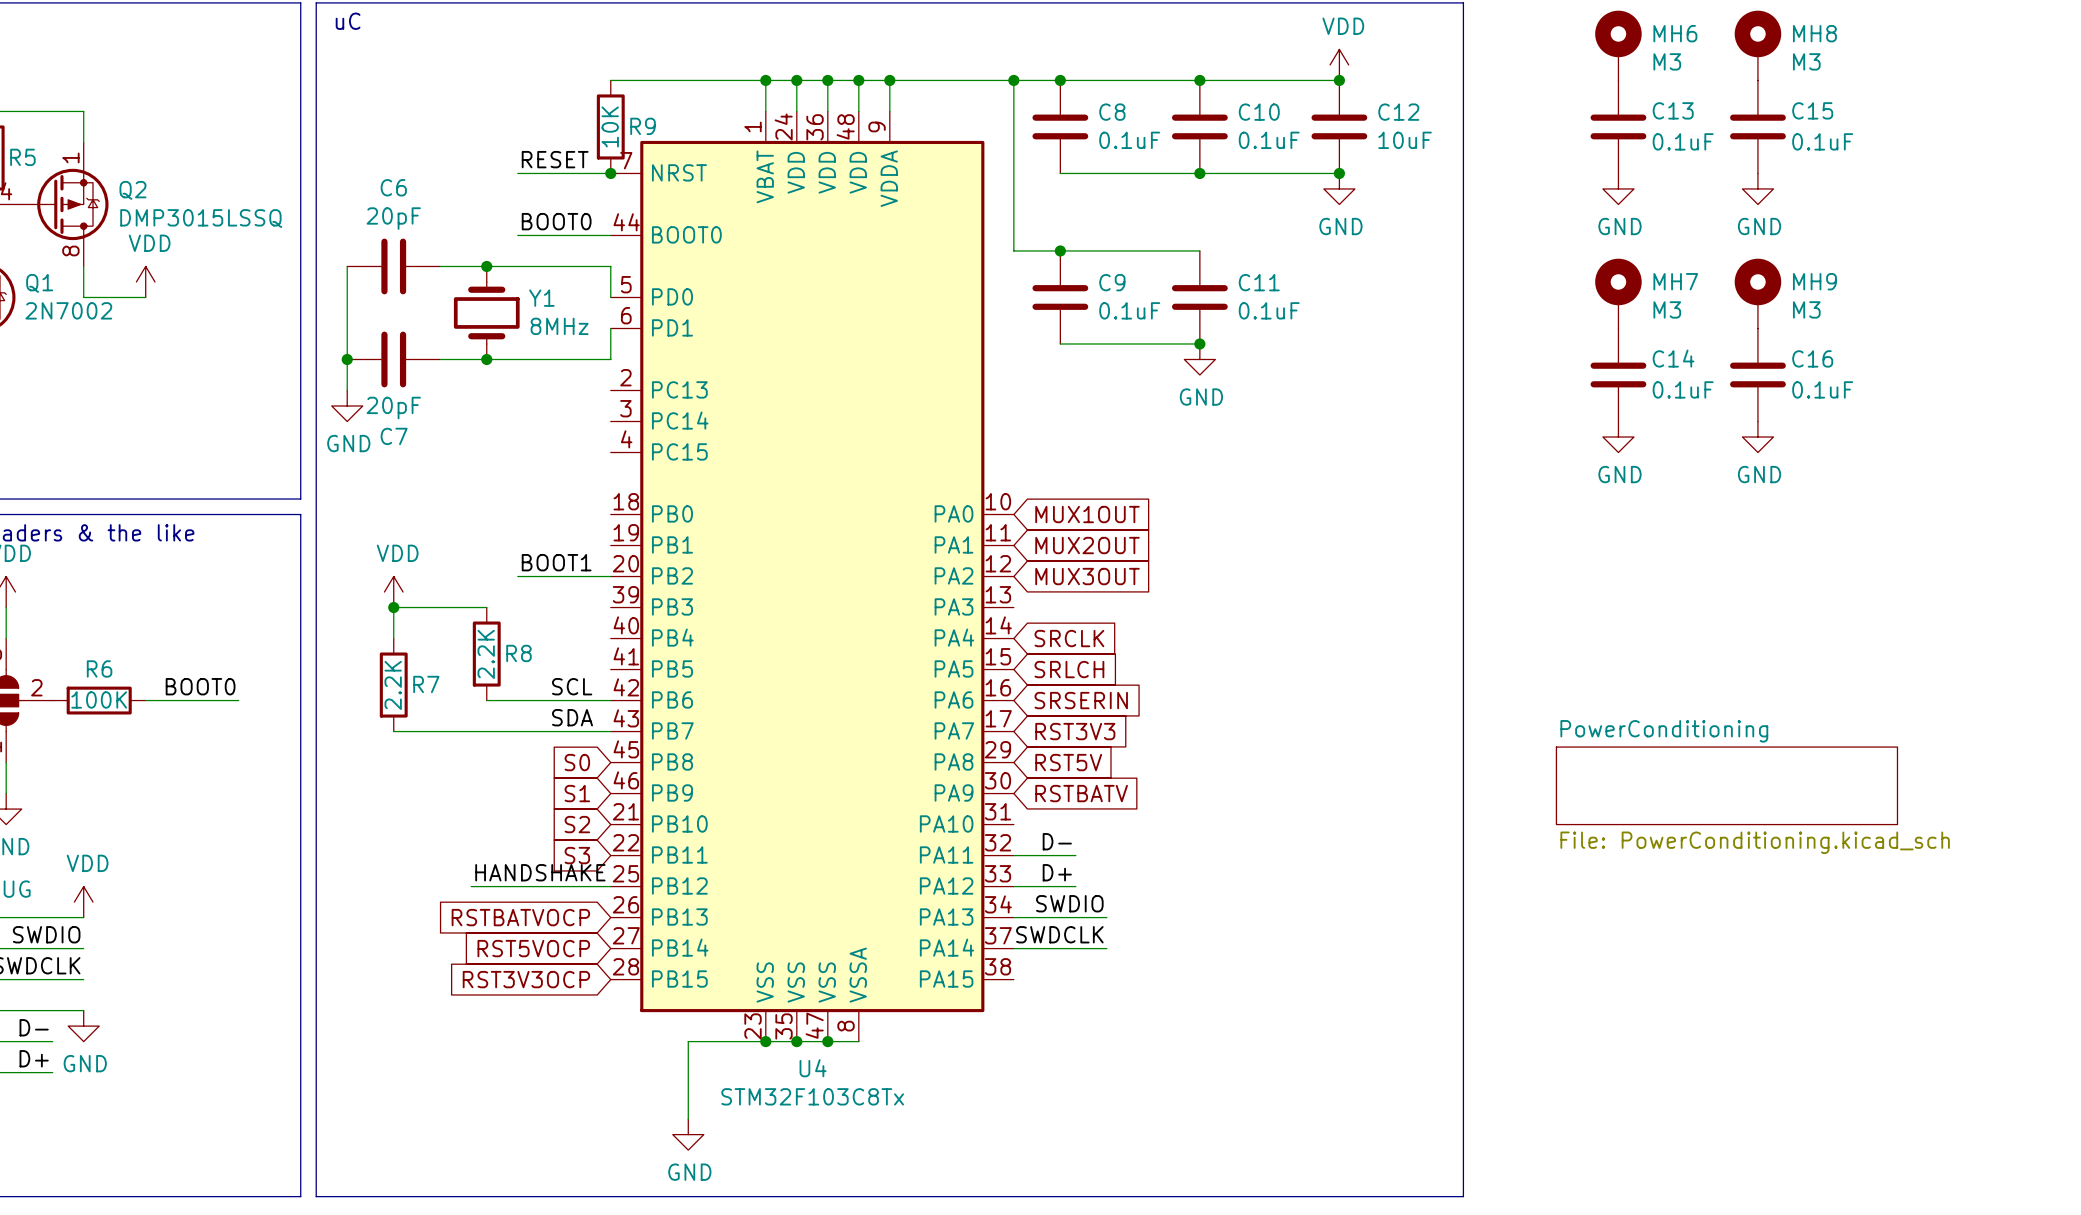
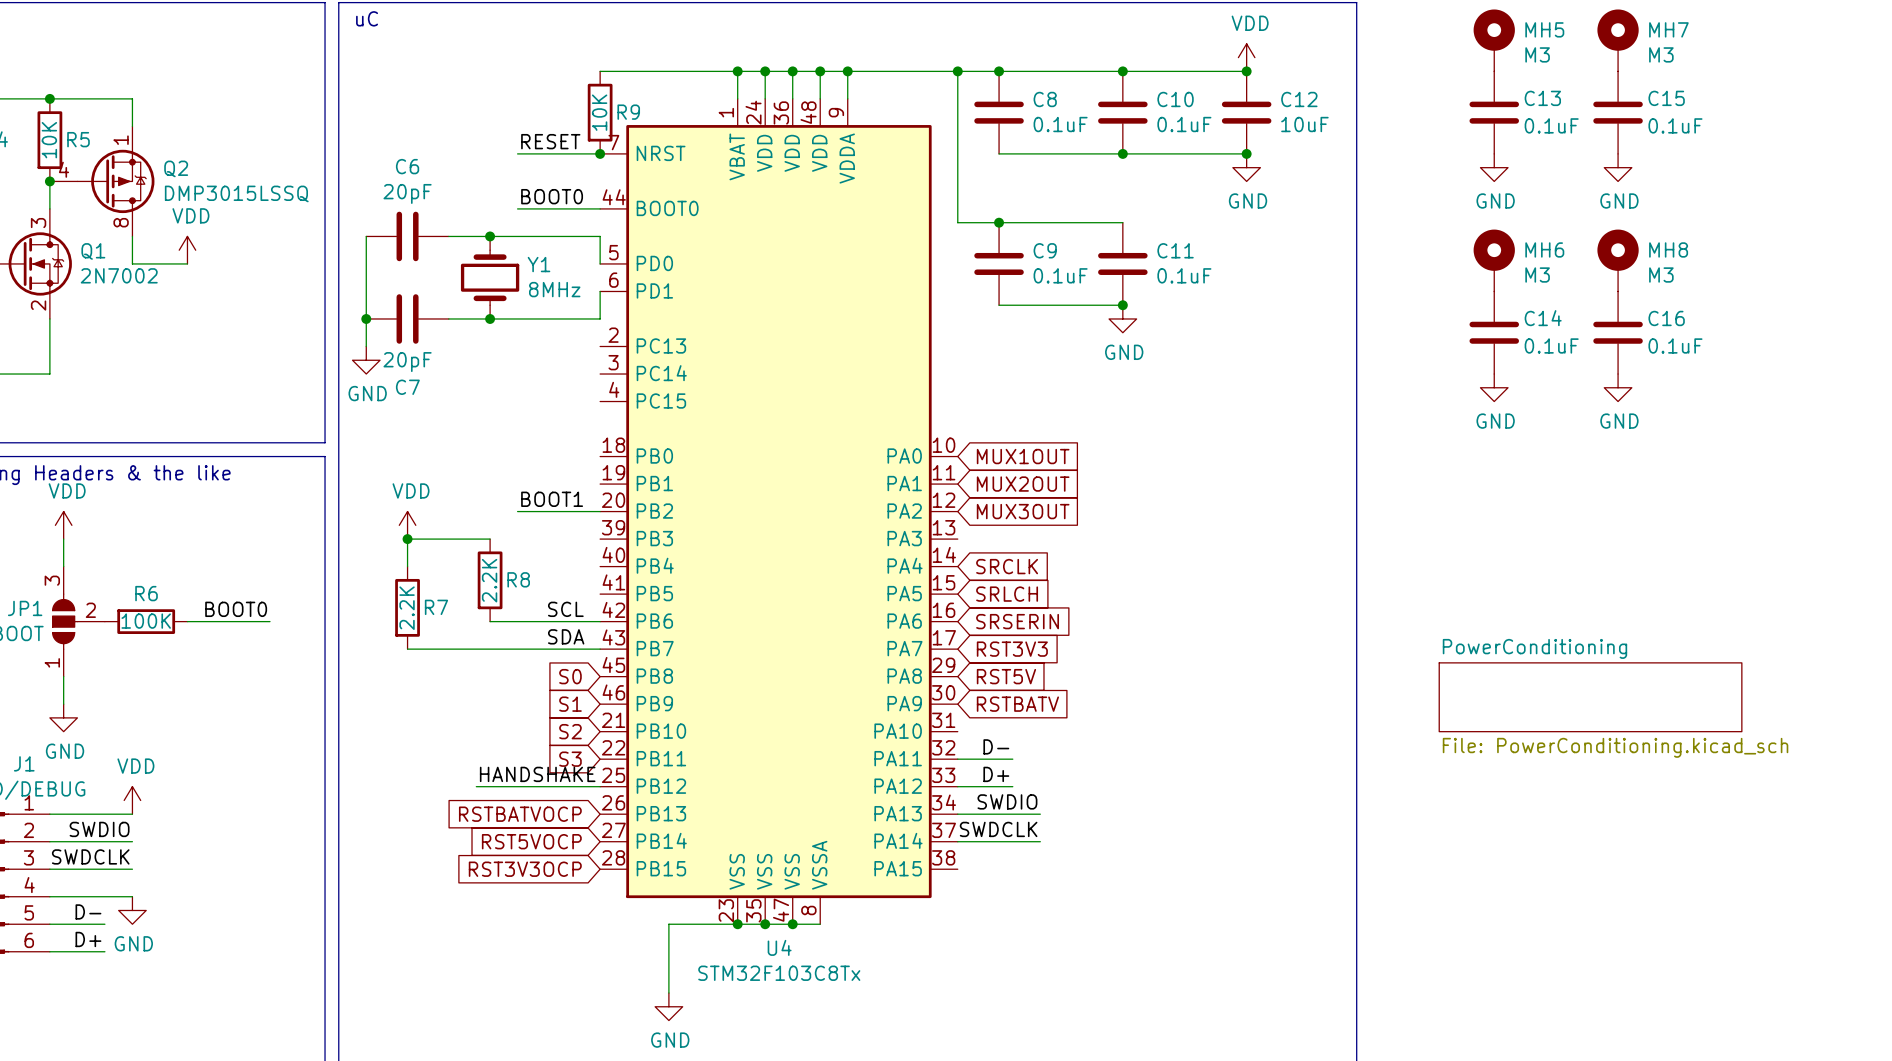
MH6 name: MH6 (1675, 33) -> MH5 (1544, 29)
MH8 name: MH8 (1814, 33) -> MH7 (1668, 29)
MH7 name: MH7 (1675, 281) -> MH6 (1544, 249)
MH9 name: MH9 (1814, 281) -> MH8 (1668, 249)

